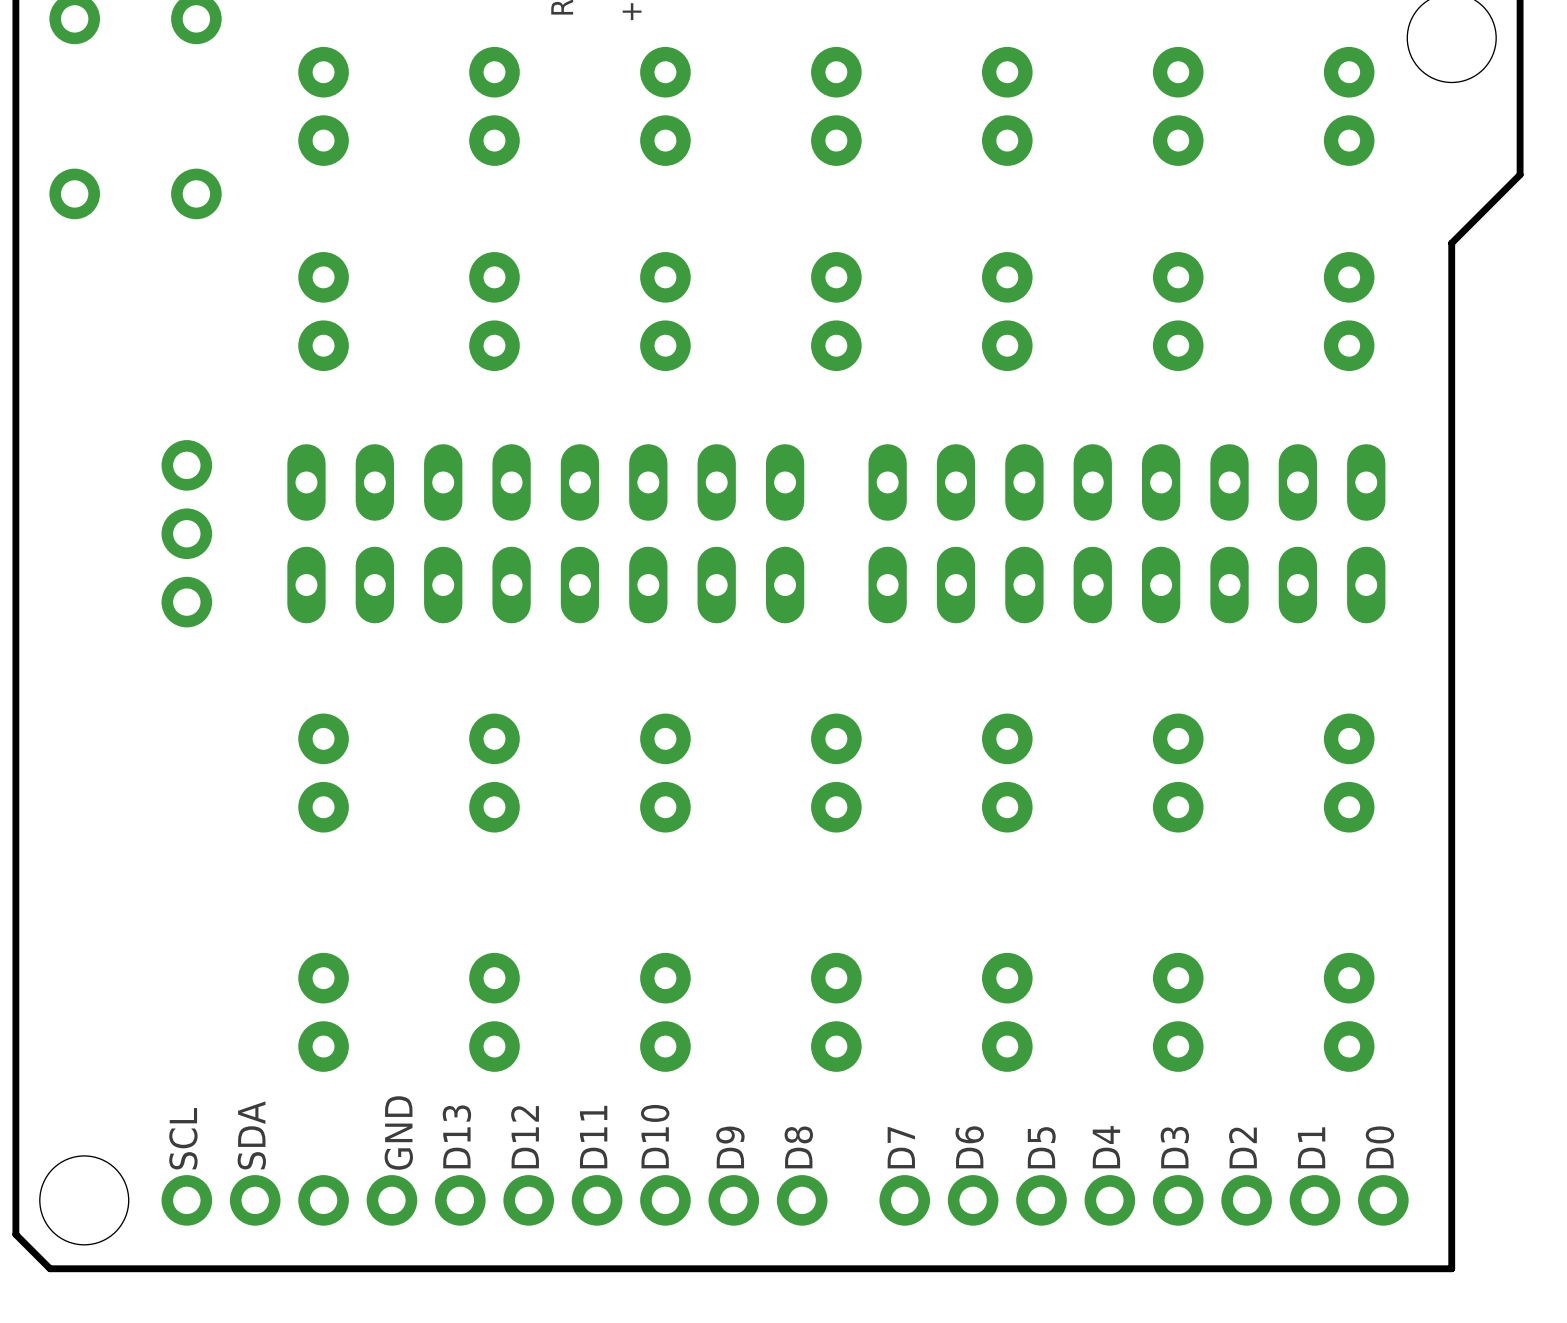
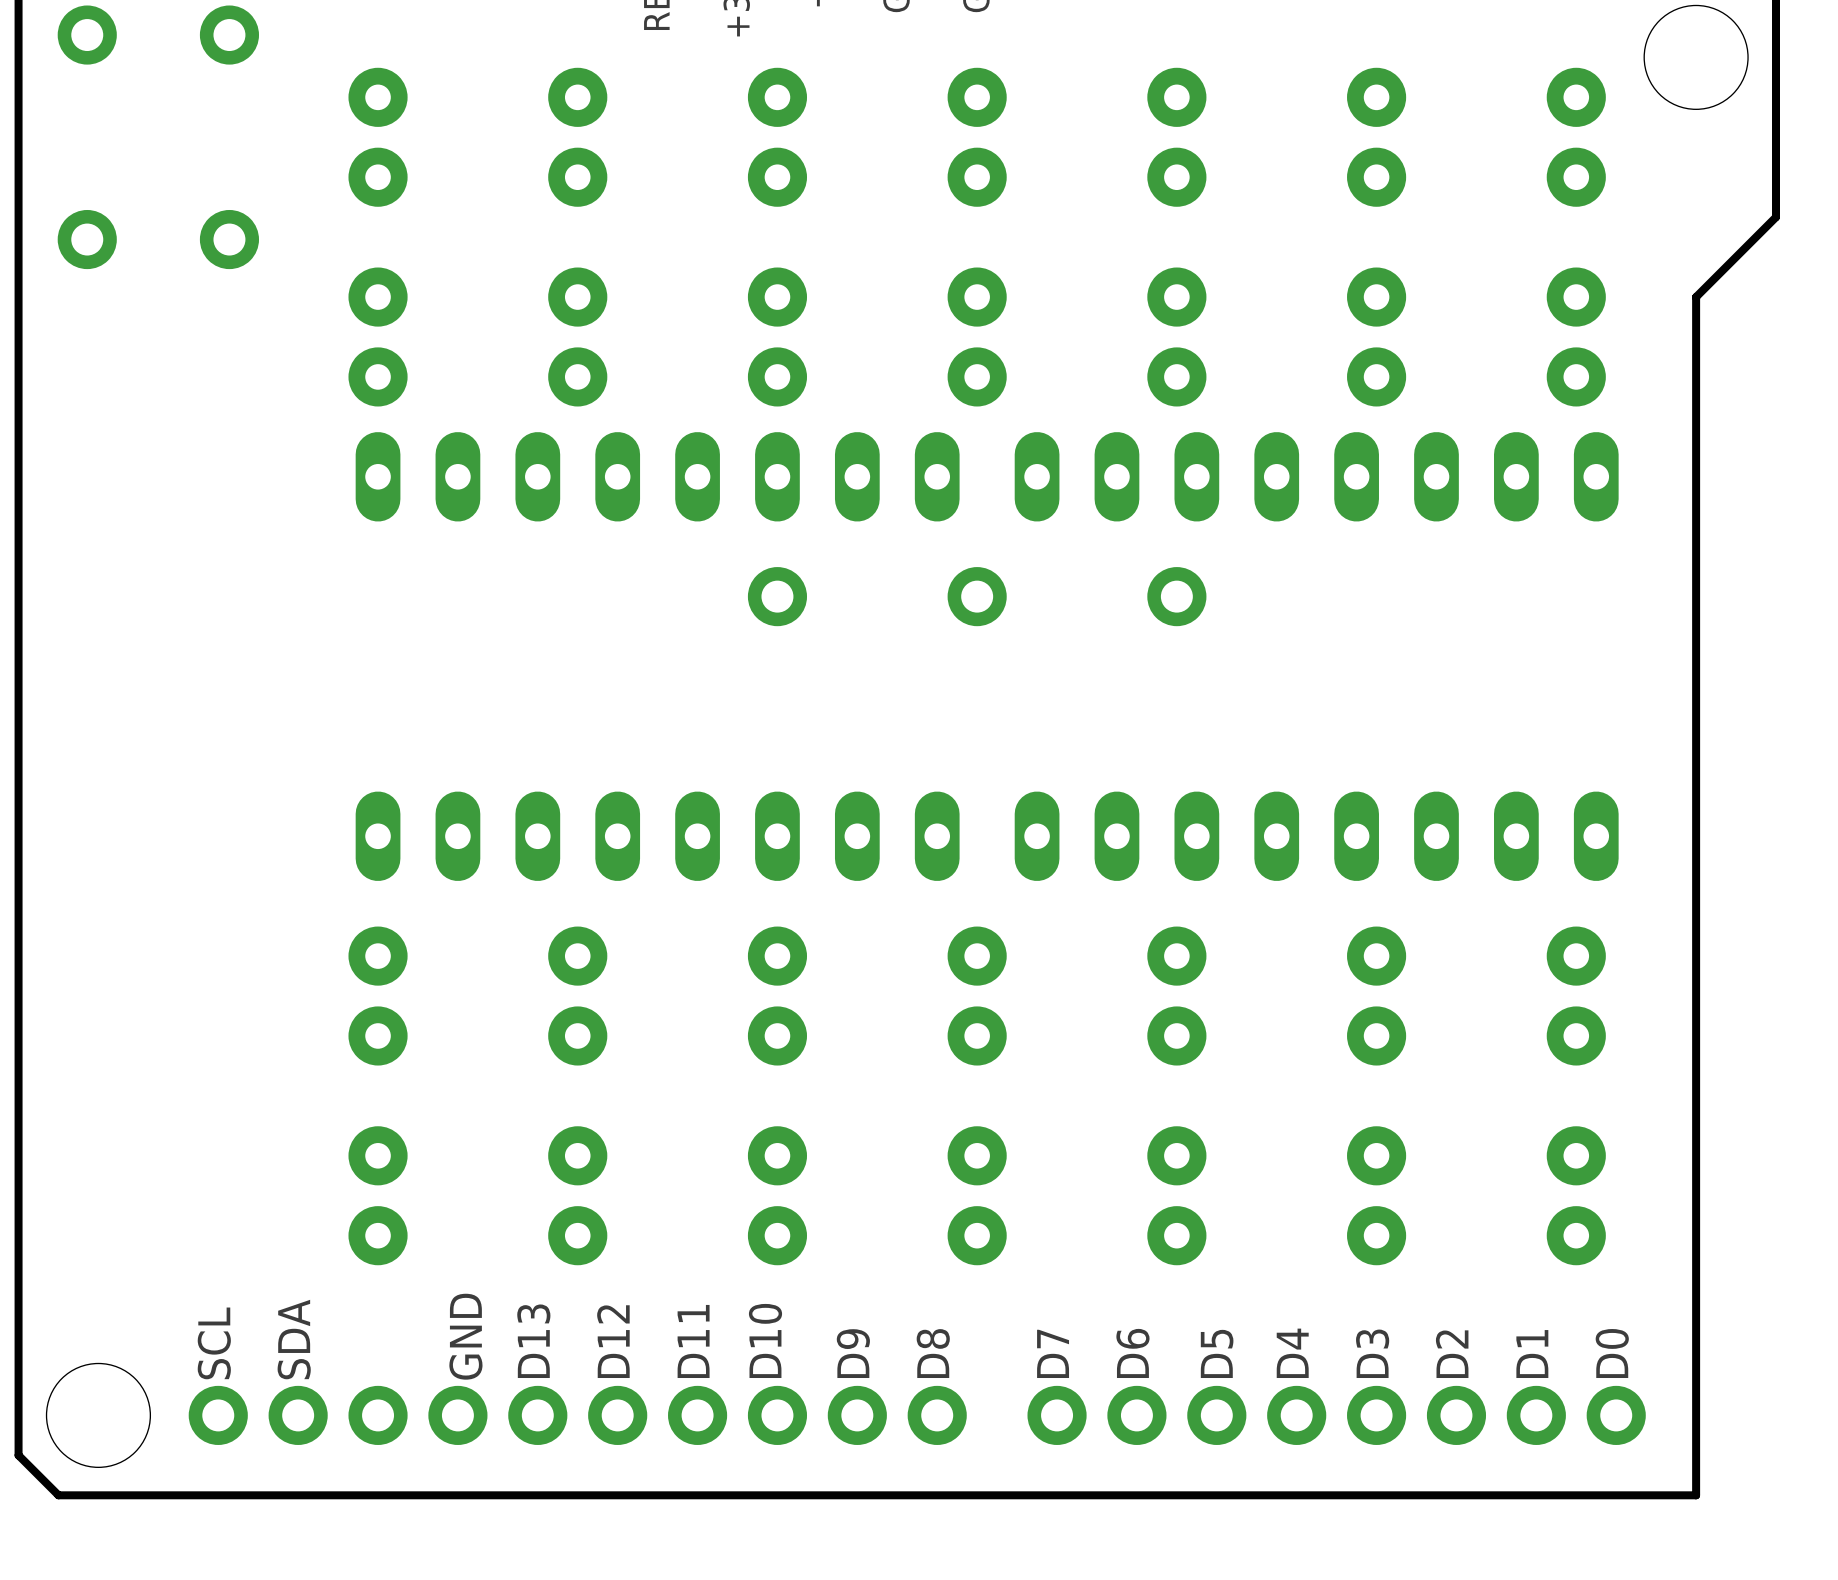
part position: (323, 311) -> (378, 337)
part position: (494, 311) -> (577, 337)
part position: (665, 311) -> (777, 337)
part position: (836, 311) -> (977, 337)
part position: (1007, 311) -> (1176, 337)
part position: (1178, 311) -> (1376, 337)
part position: (1349, 311) -> (1576, 337)
part: (186, 465) -> none
part position: (545, 482) -> (657, 476)
part position: (1126, 482) -> (1316, 476)
part: none -> (777, 596)
part: none -> (977, 596)
part: none -> (1176, 596)
part: (186, 533) -> none
part: (545, 585) -> none
part: (1126, 585) -> none
part: (186, 602) -> none
part: none -> (657, 836)
part: none -> (1316, 836)
part position: (323, 773) -> (378, 996)
part position: (494, 773) -> (577, 996)
part position: (665, 773) -> (777, 996)
part position: (836, 773) -> (977, 996)
part position: (1007, 773) -> (1176, 996)
part position: (1178, 773) -> (1376, 996)
part position: (1349, 773) -> (1576, 996)

